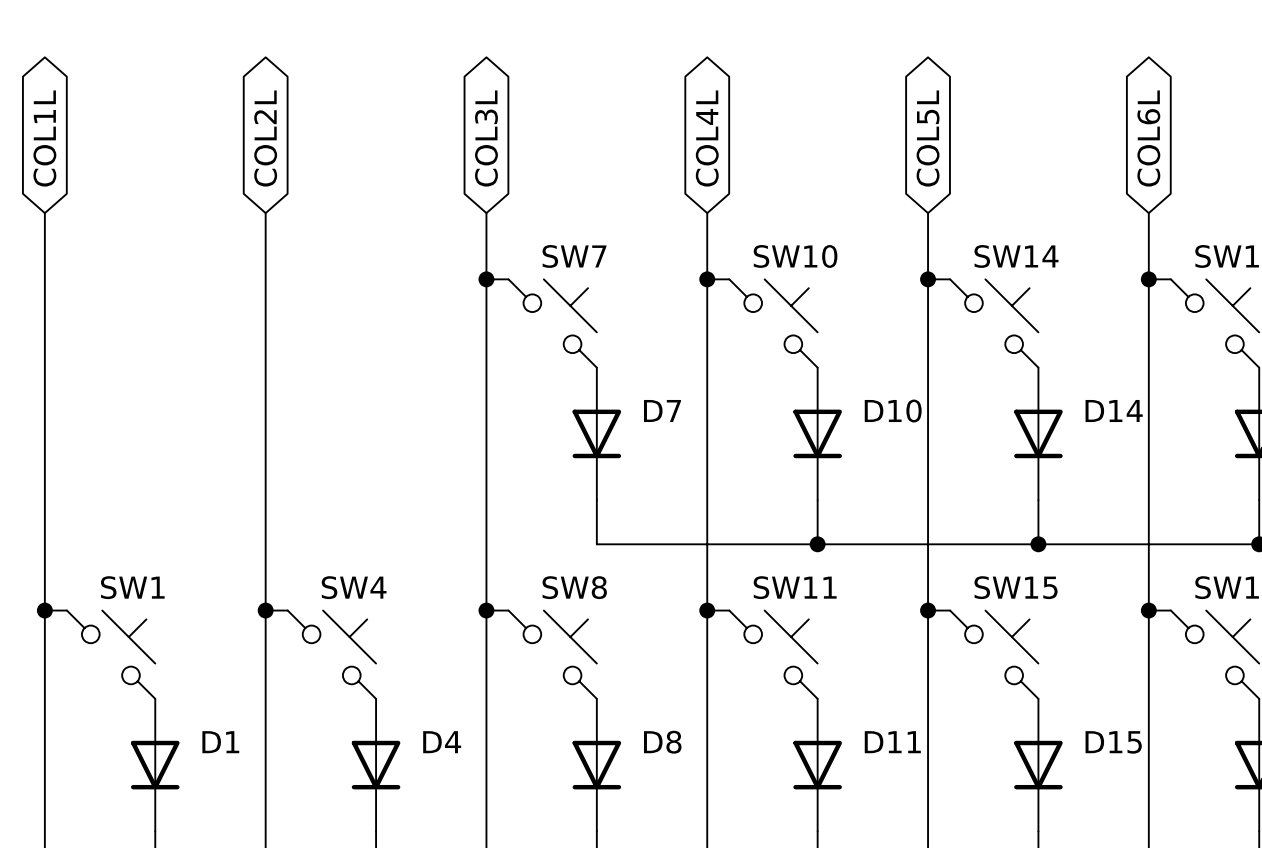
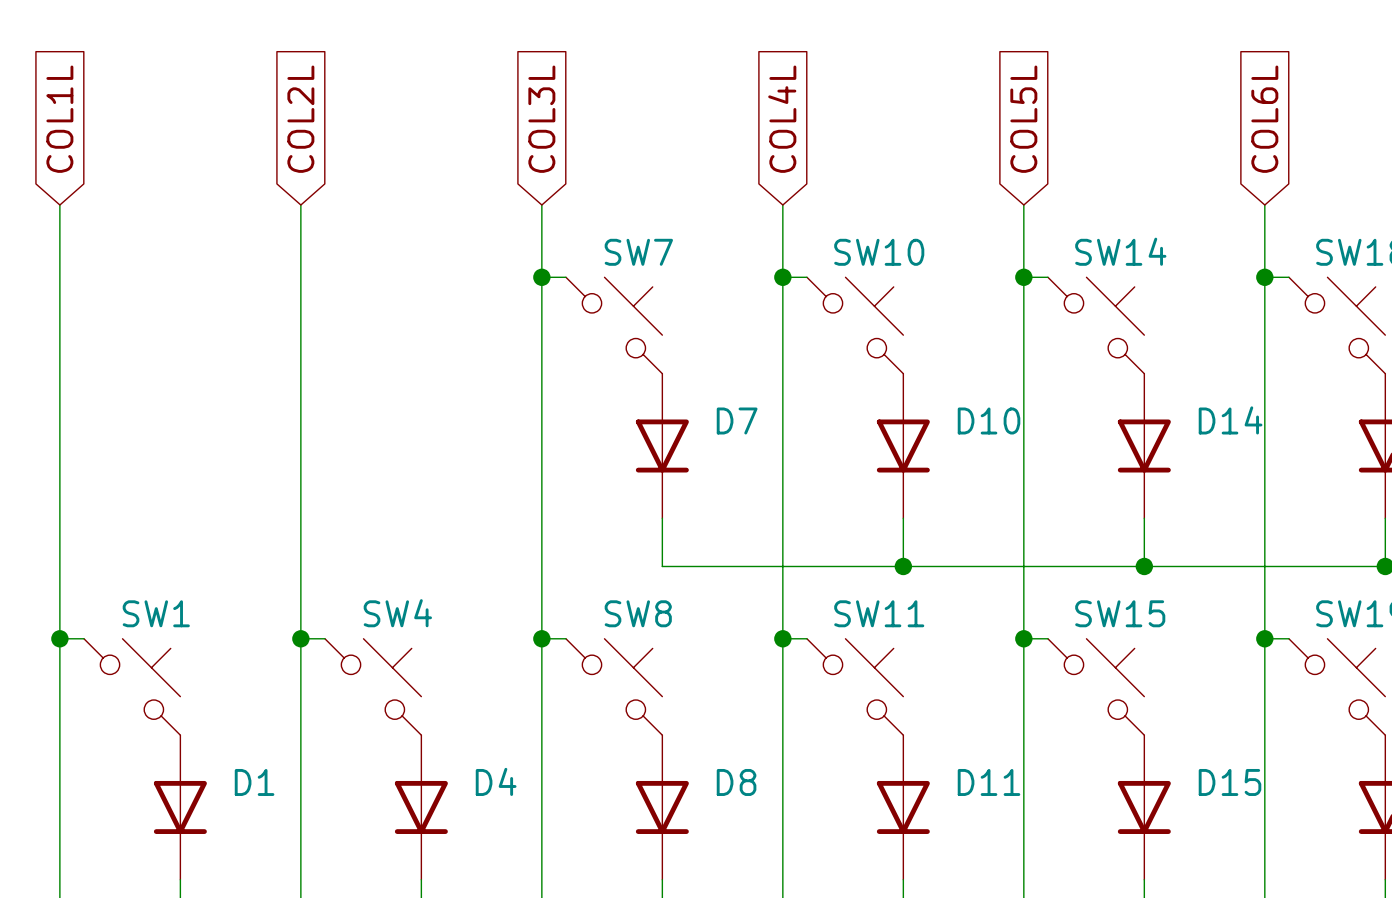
global label shape: bidirectional (44, 138) -> input (59, 119)
global label shape: bidirectional (265, 138) -> input (300, 119)
global label shape: bidirectional (486, 138) -> input (541, 119)
global label shape: bidirectional (707, 138) -> input (782, 119)
global label shape: bidirectional (928, 138) -> input (1023, 119)
global label shape: bidirectional (1148, 138) -> input (1264, 119)

